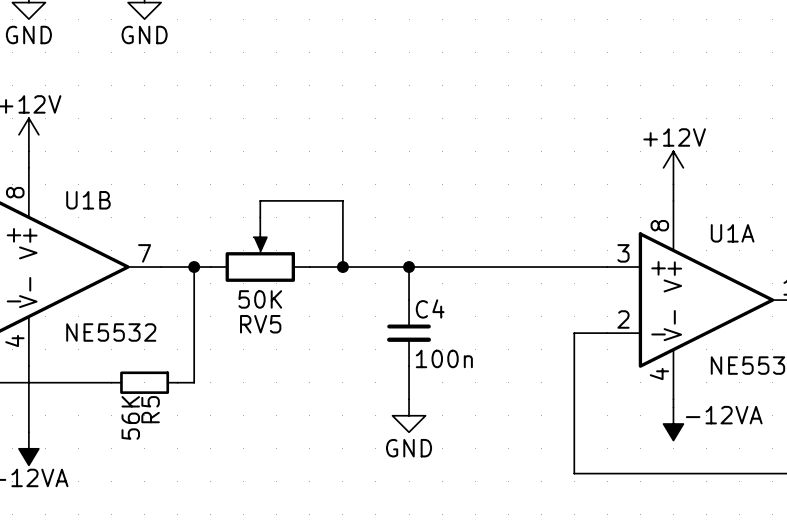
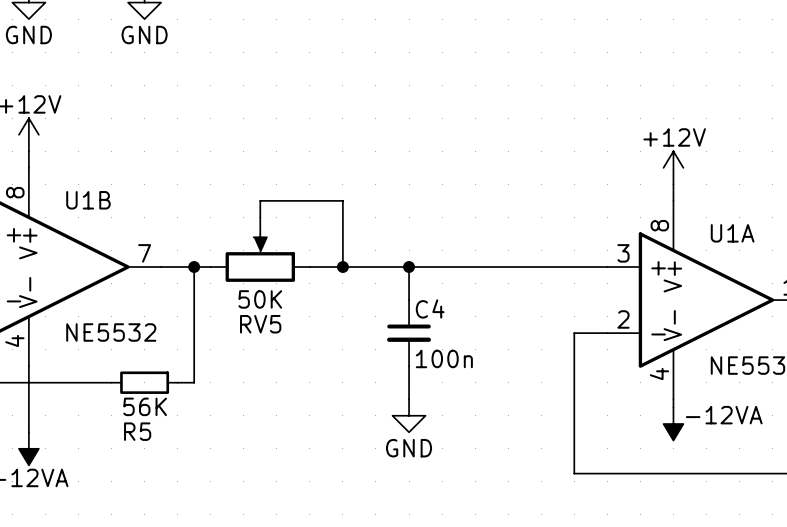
R5 name rotation: 0° (150, 409) -> 90° clockwise (137, 431)
R5 value rotation: 0° (130, 417) -> 90° clockwise (145, 406)

